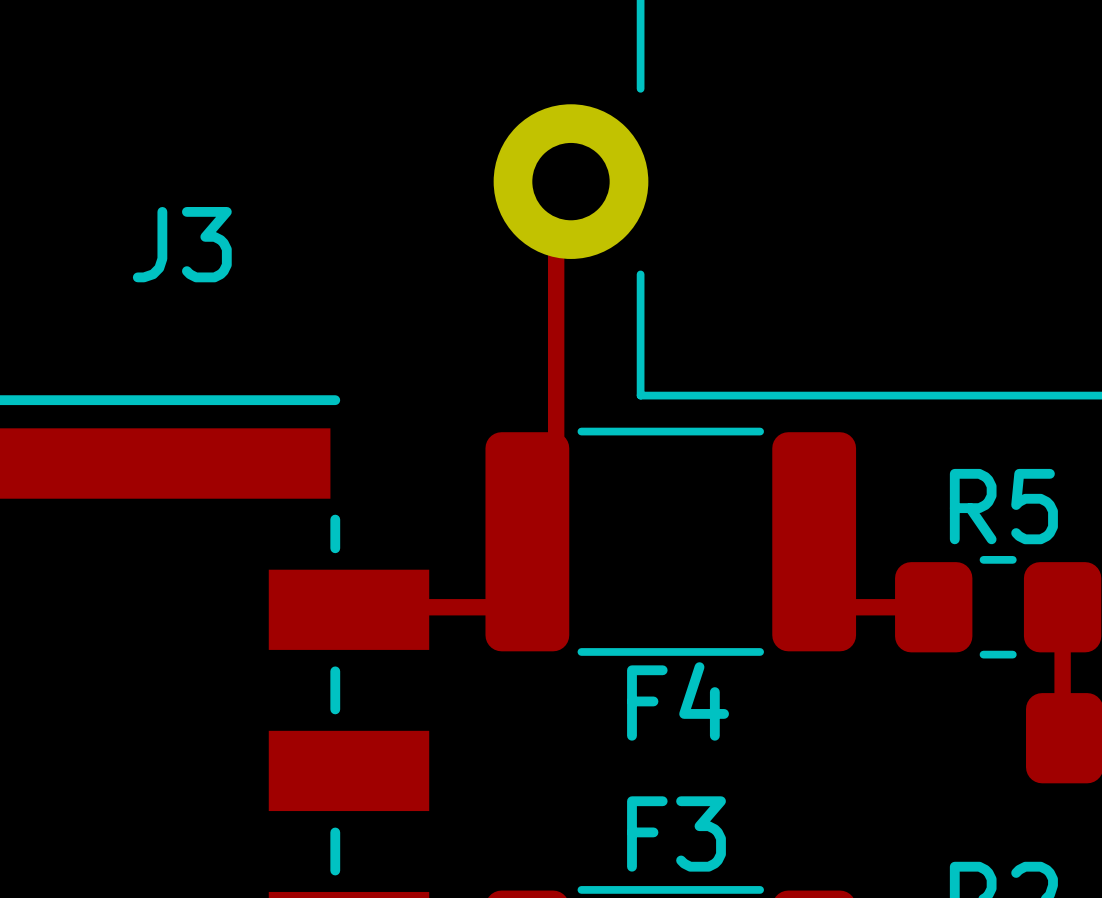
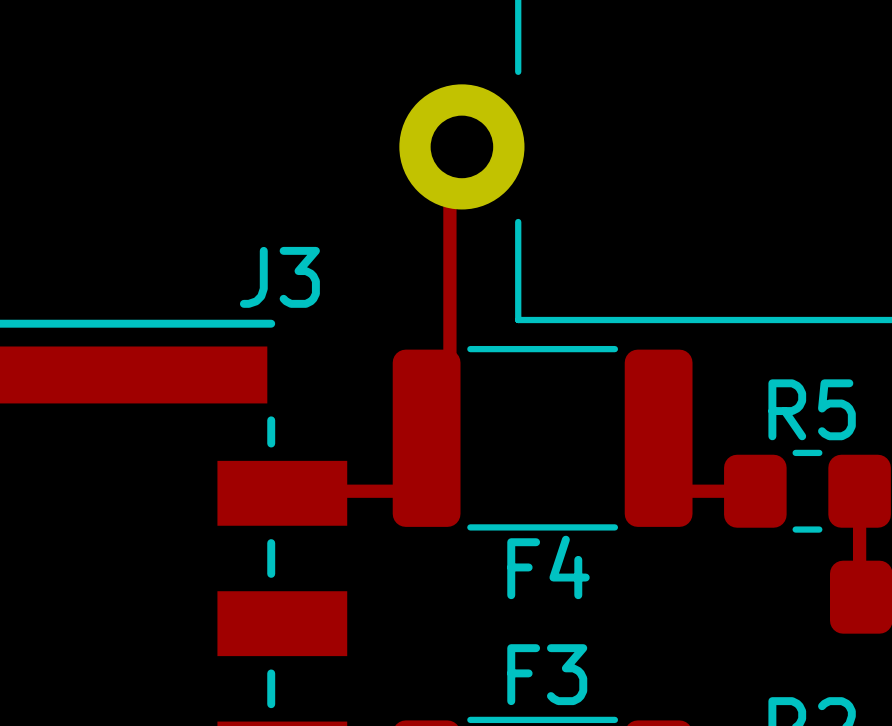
J3 name position: J3 (182, 244) -> J3 (279, 277)

